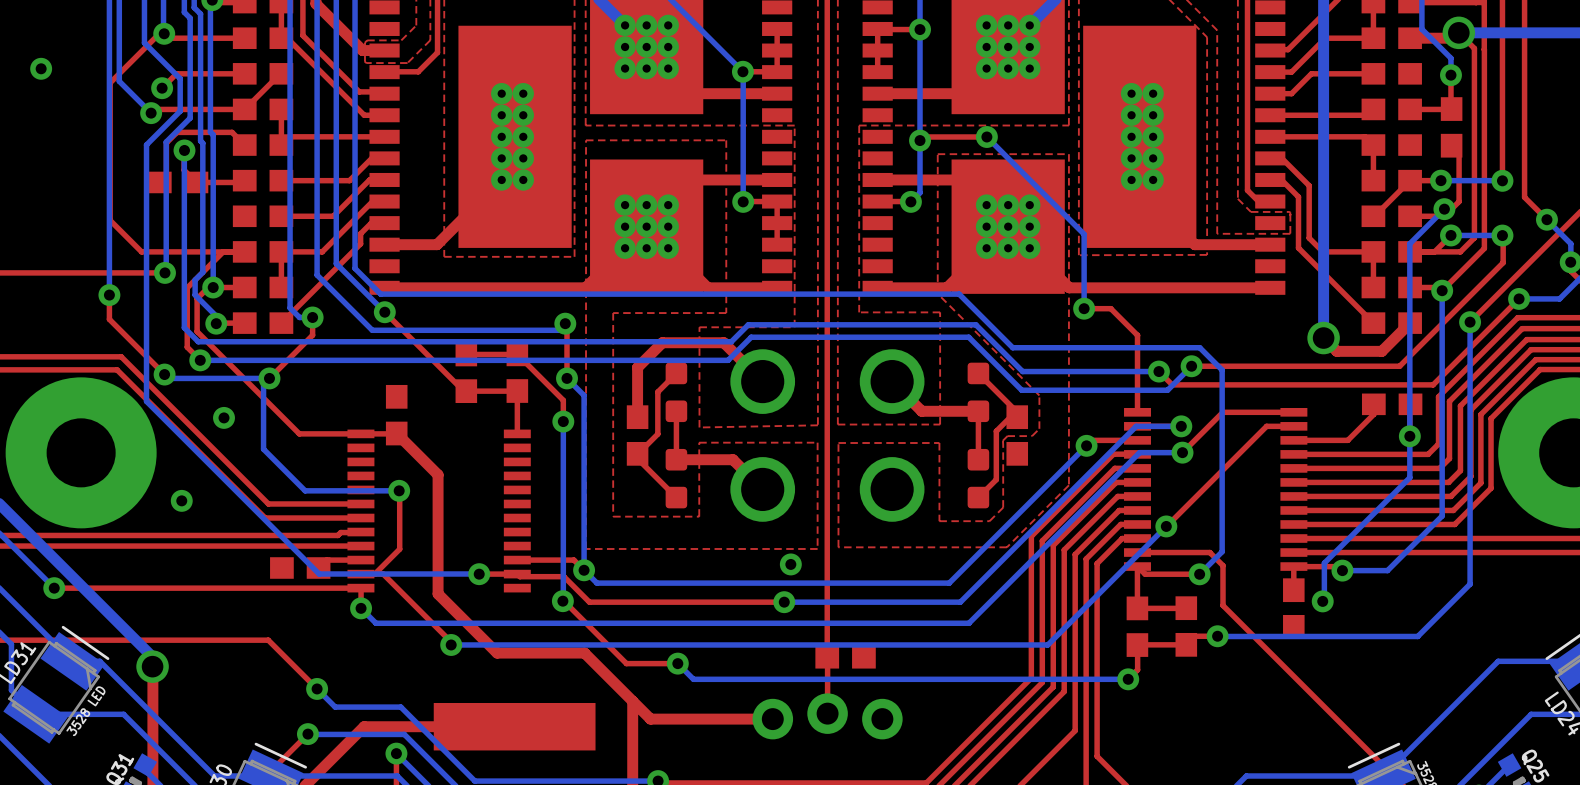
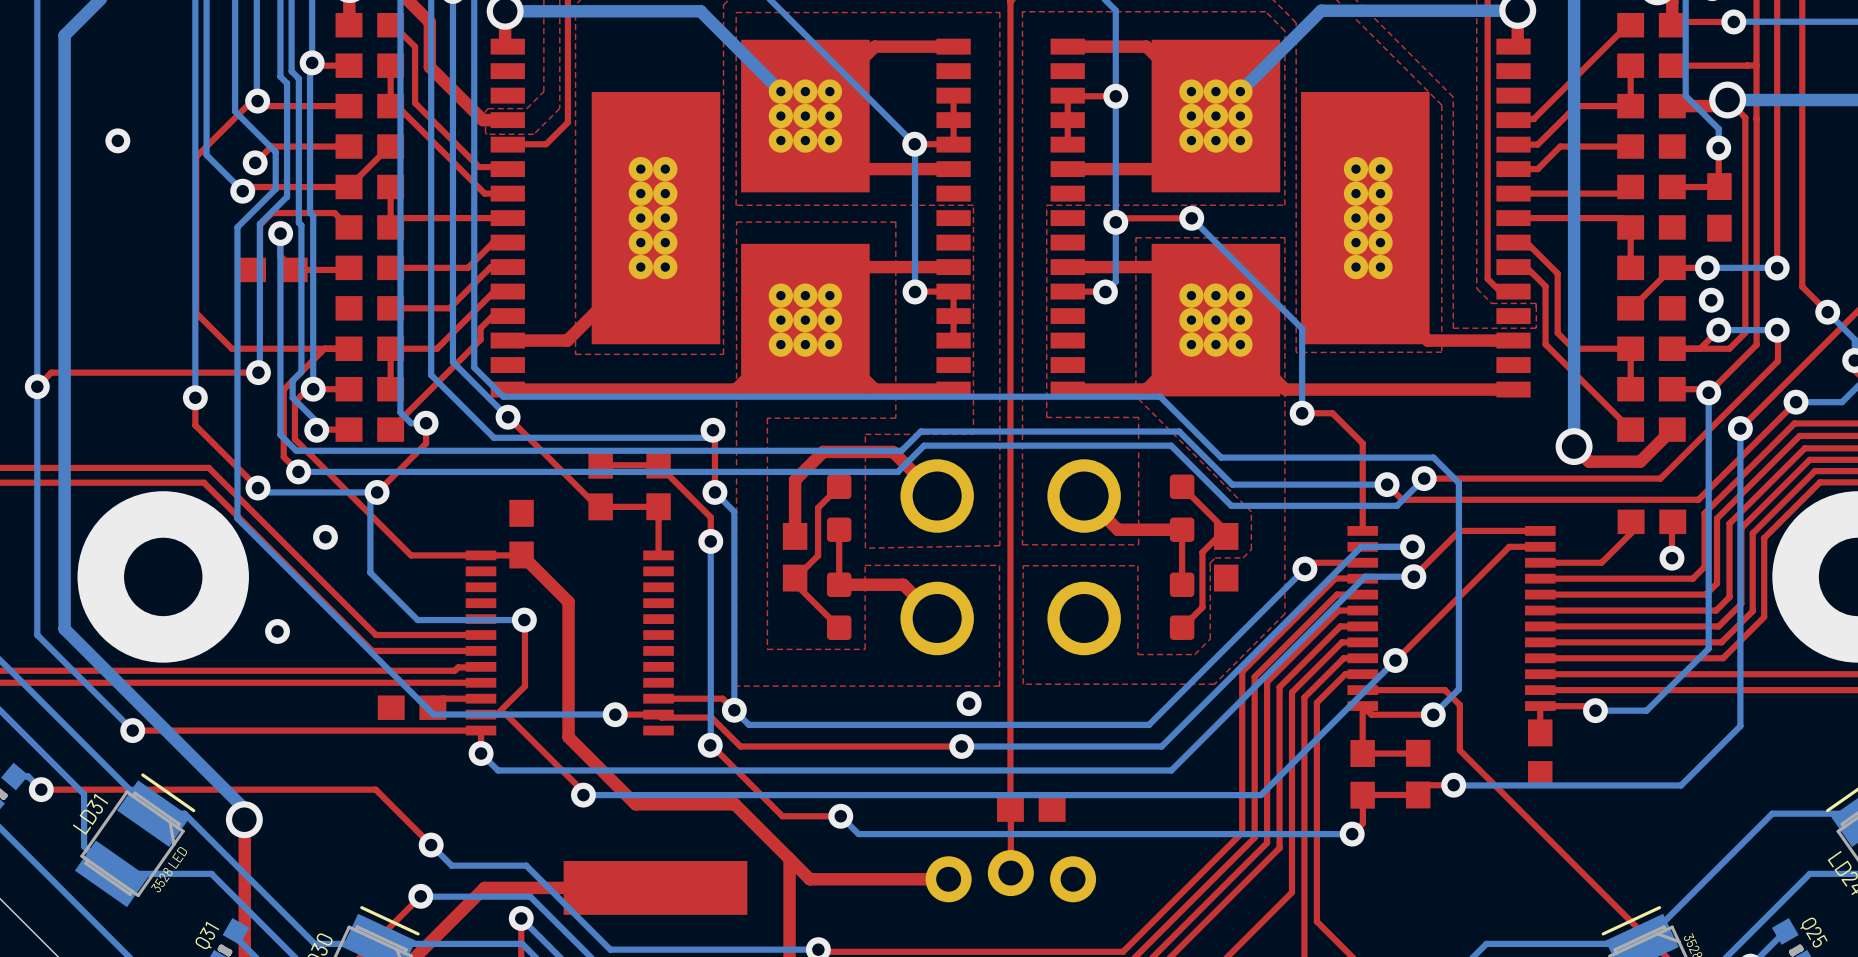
top track: (1451, 145) (1459, 153) (1459, 201) (1451, 209) (1444, 209) (1437, 216) (1410, 216) -> none
bottom track: (1444, 209) (1409, 243) (1409, 477) (1324, 563) (1324, 599) (1322, 601) -> none
via: (1322, 601) -> none

